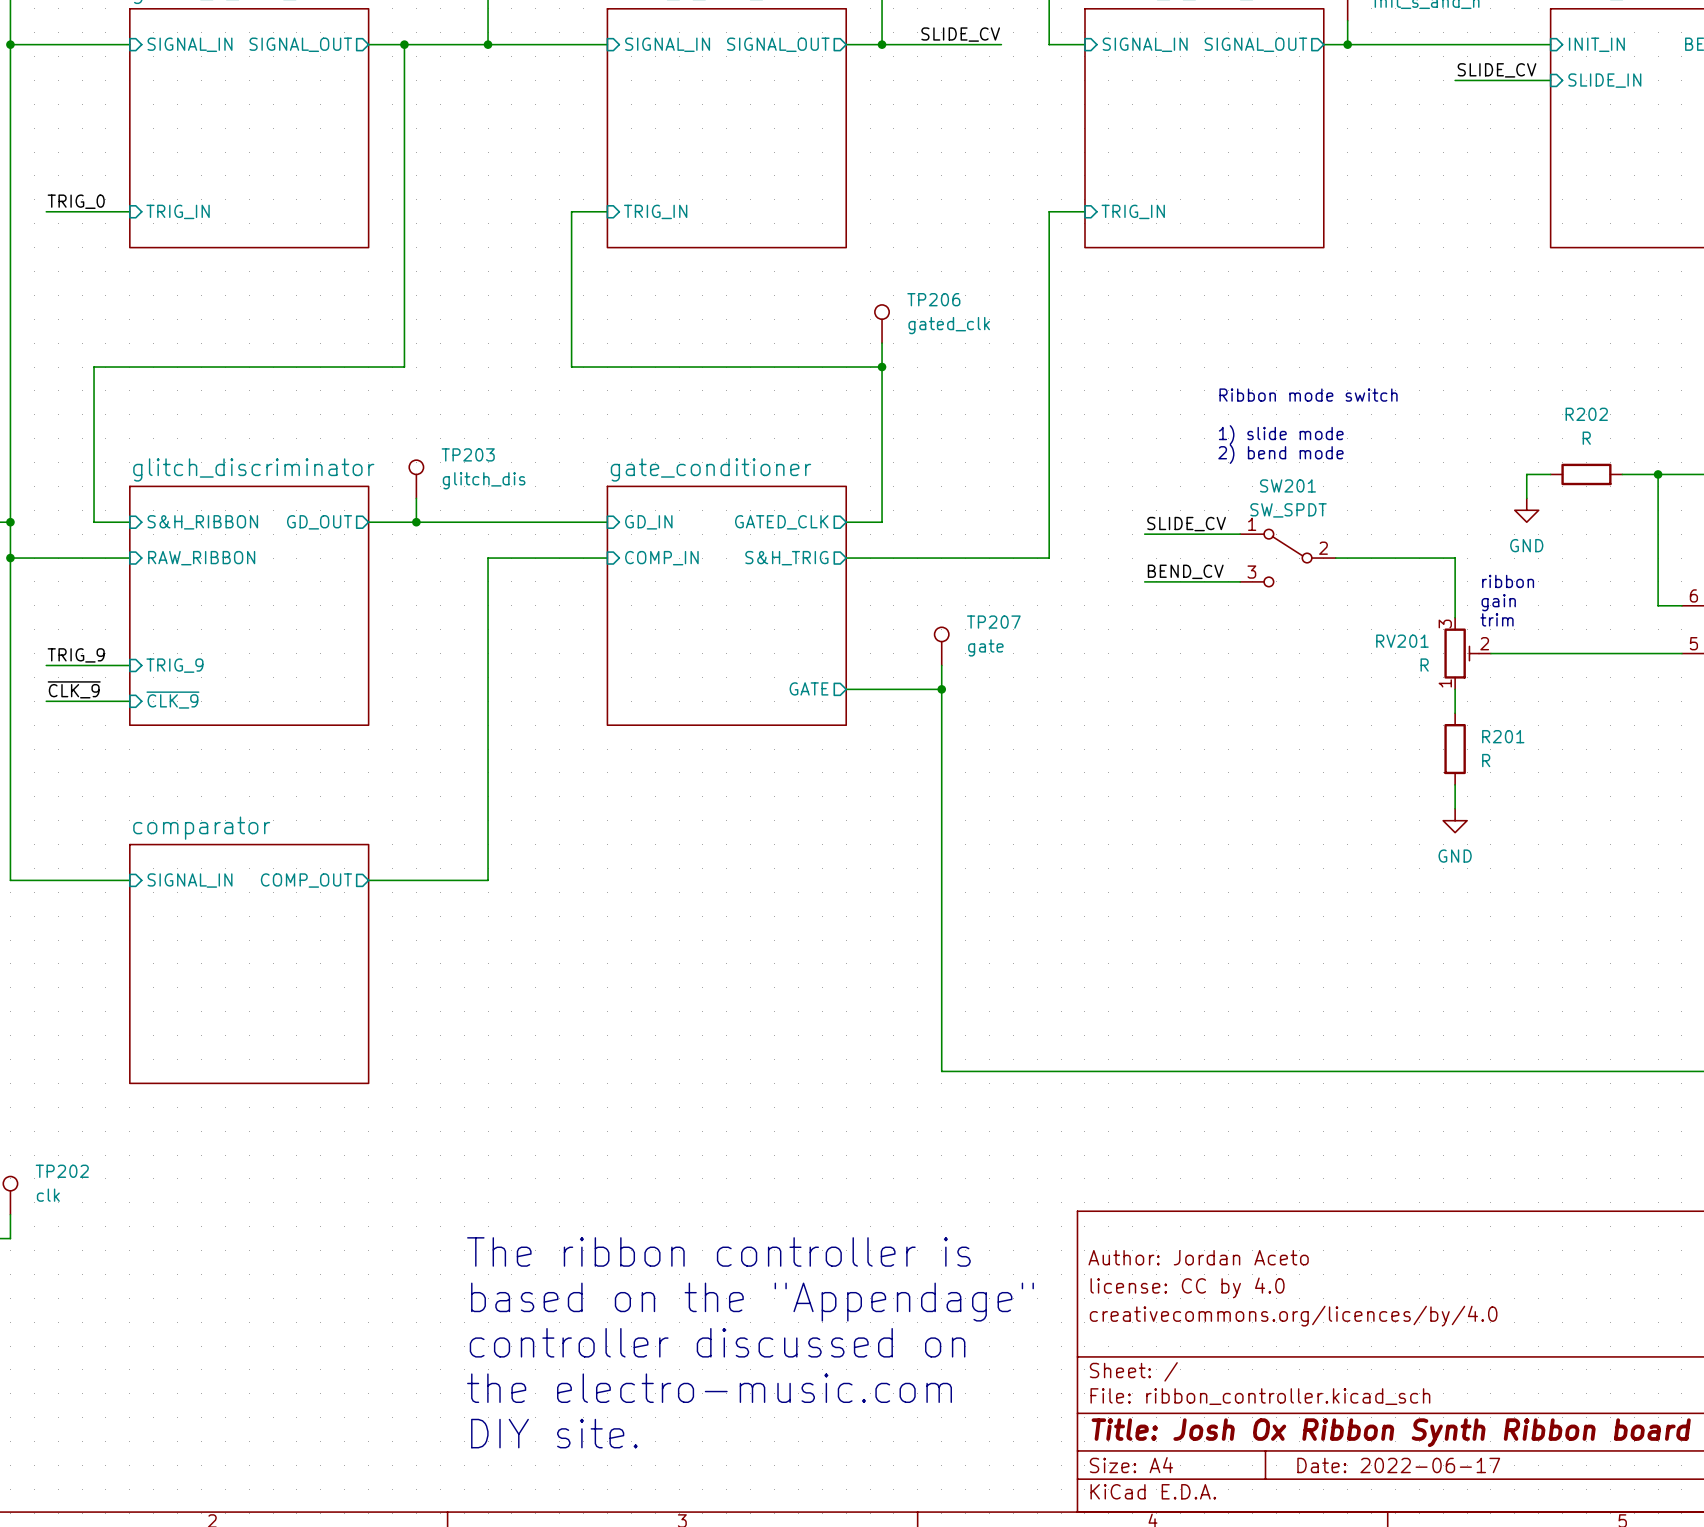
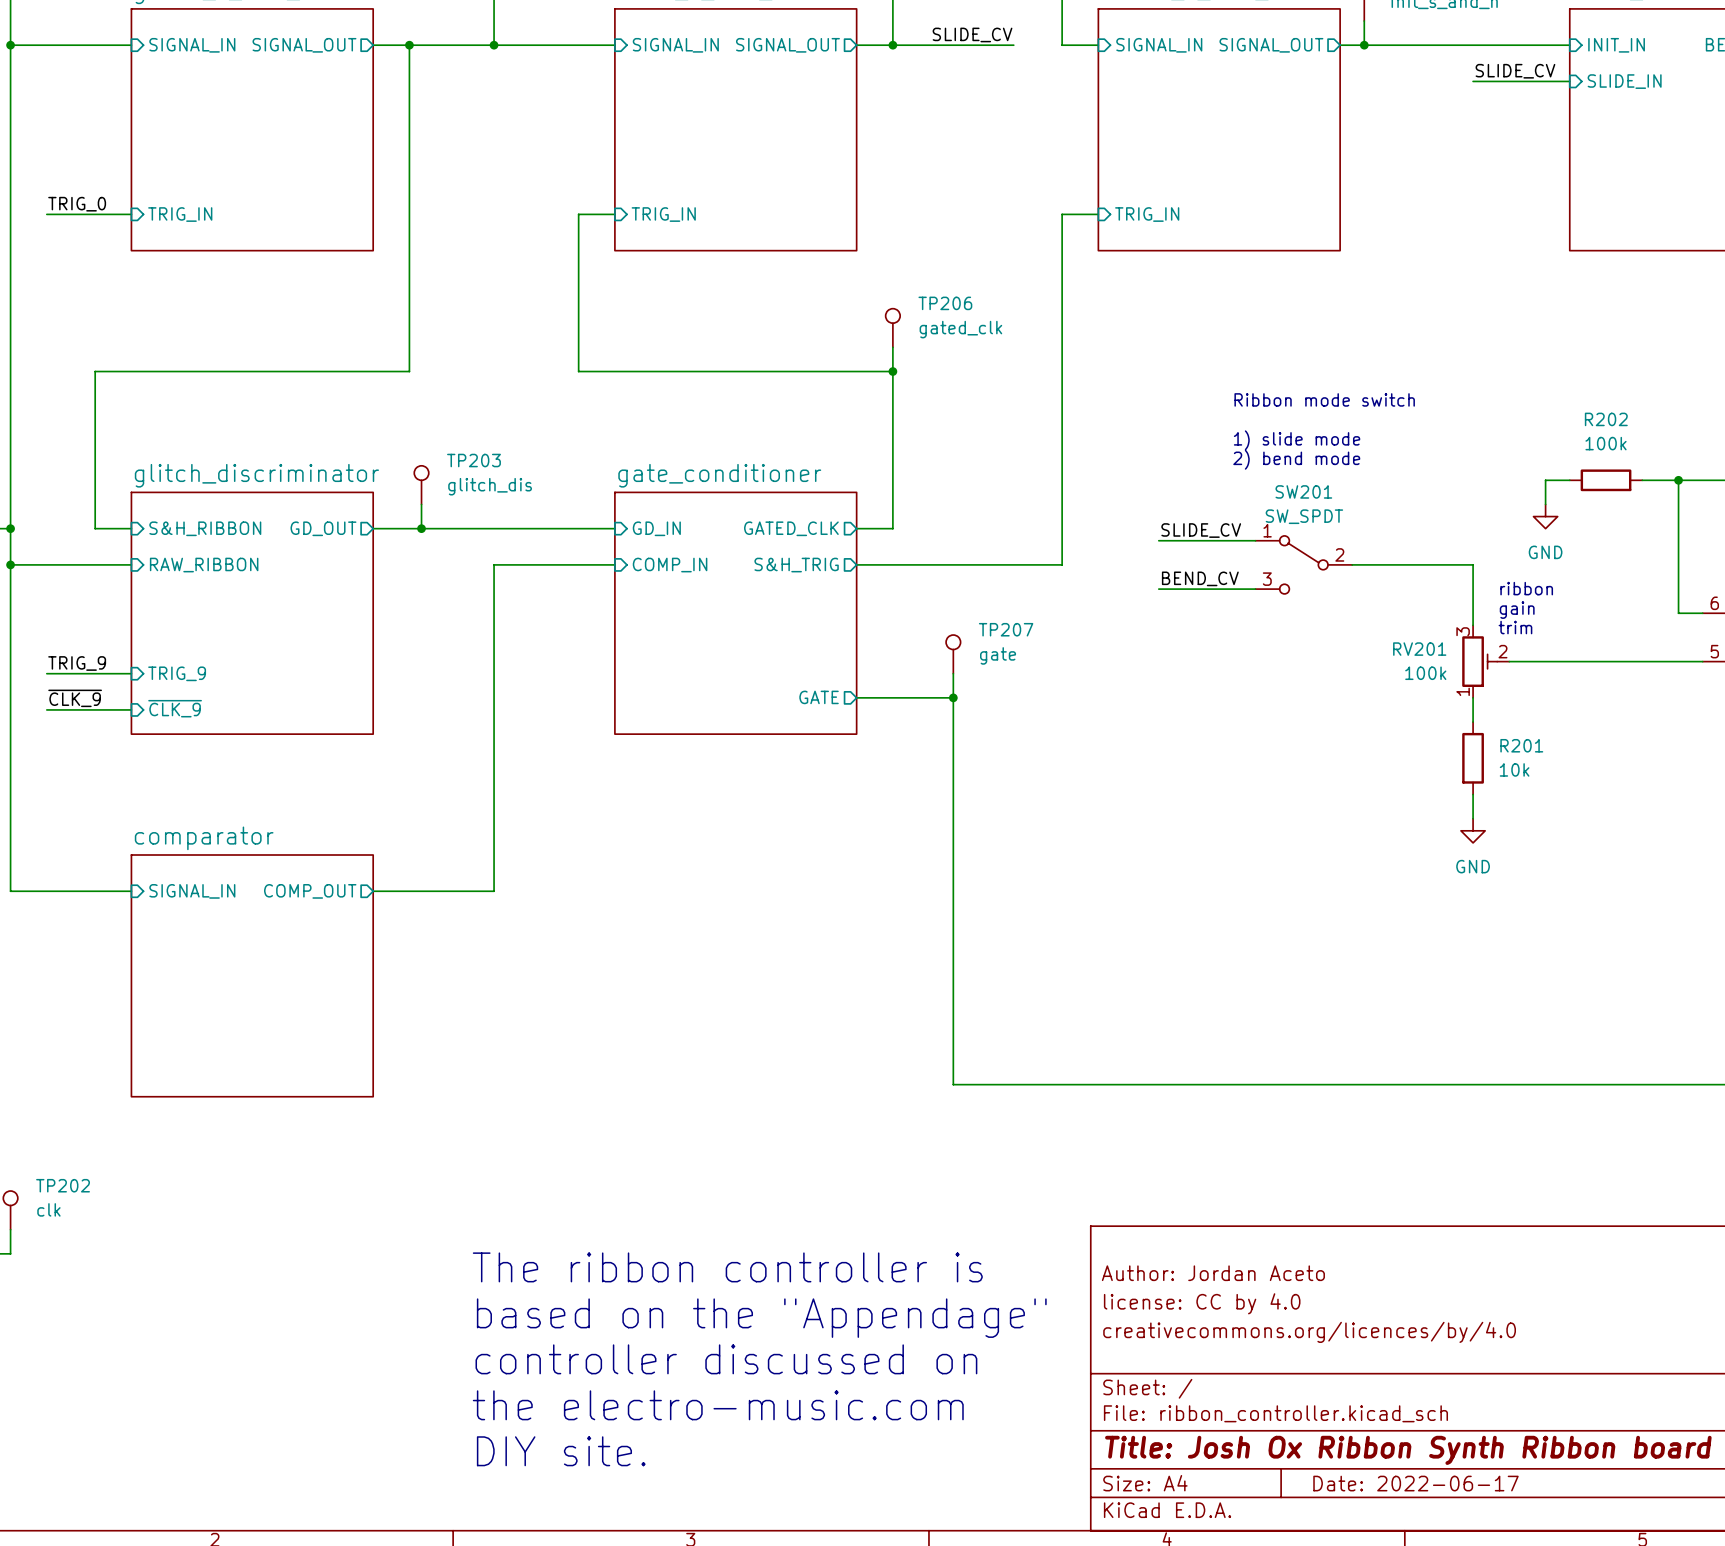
R202 value: R (1586, 438) -> 100k (1606, 443)
RV201 value: R (1424, 665) -> 100k (1425, 673)
R201 value: R (1486, 760) -> 10k (1514, 769)

